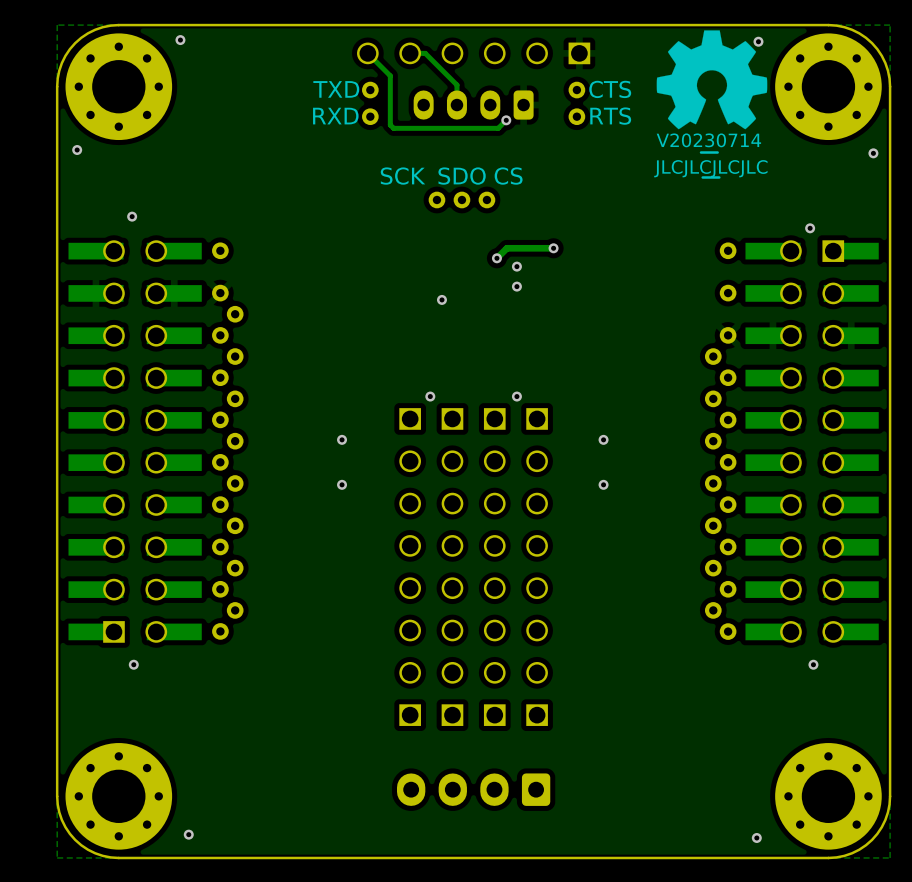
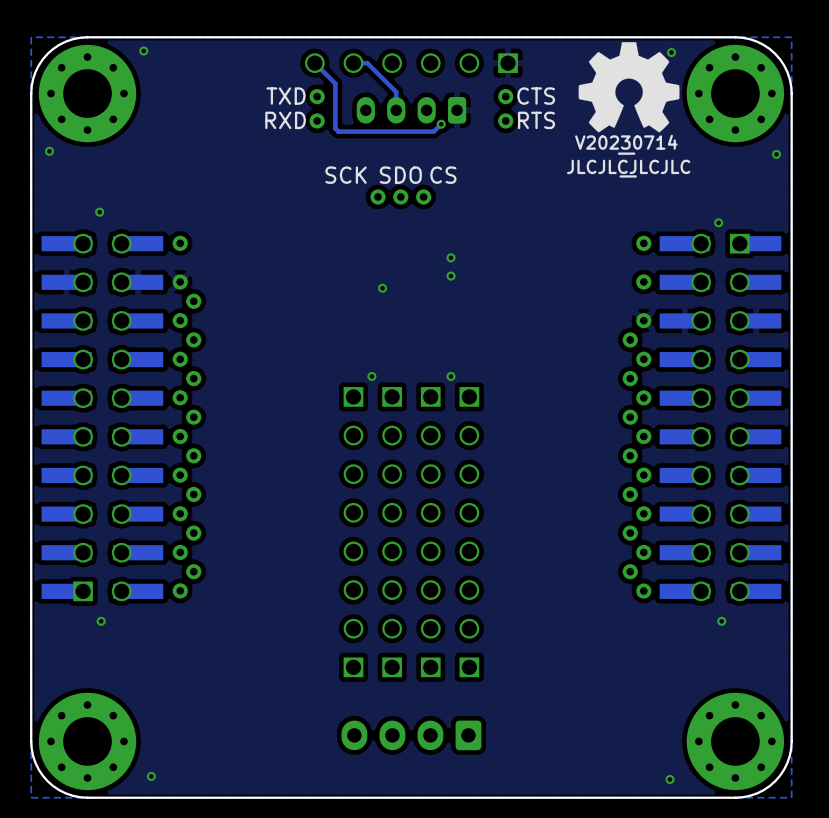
track: (553, 248) (506, 248) (496, 258) -> none
via: (553, 248) -> none
via: (496, 258) -> none
via: (342, 439) -> none
via: (603, 439) -> none
via: (342, 484) -> none
via: (603, 484) -> none

